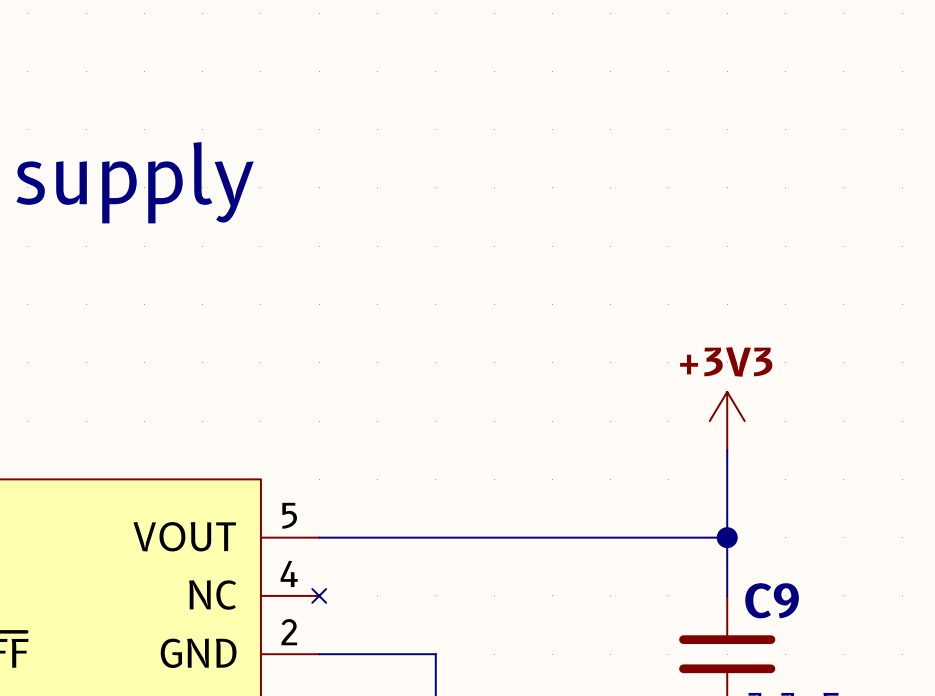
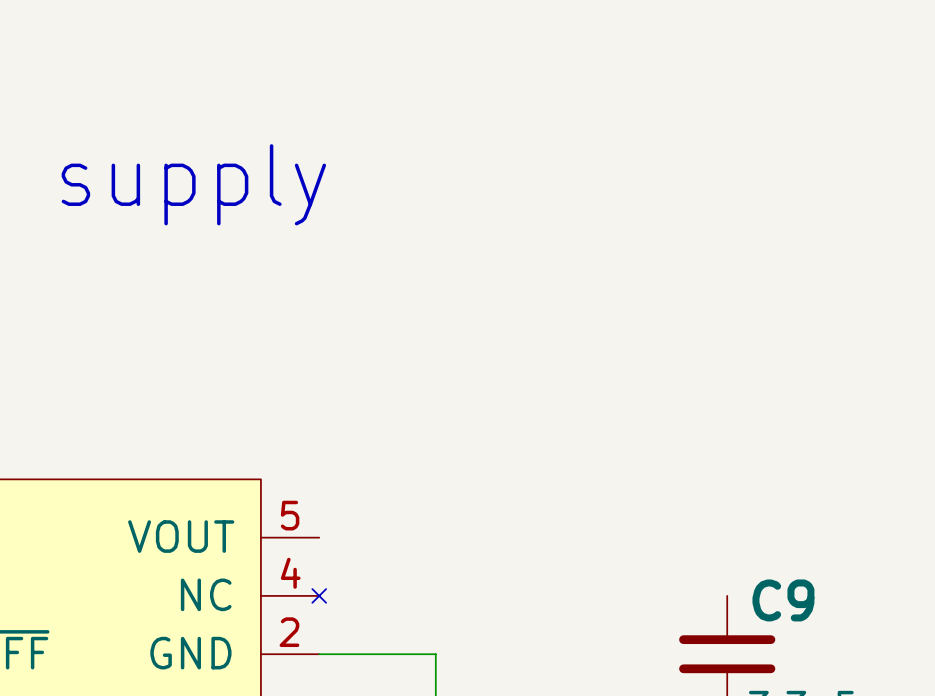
power symbol: (727, 421) -> none
wire: (727, 450) (727, 595) -> none
wire: (319, 537) (727, 537) -> none
junction: (727, 537) -> none

